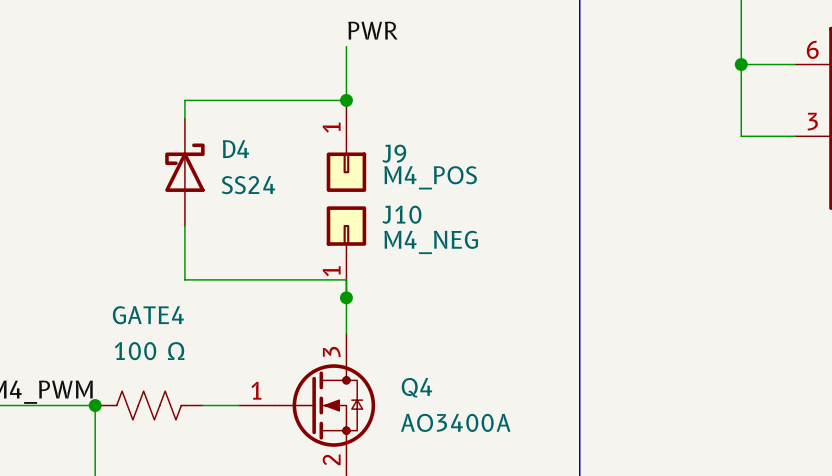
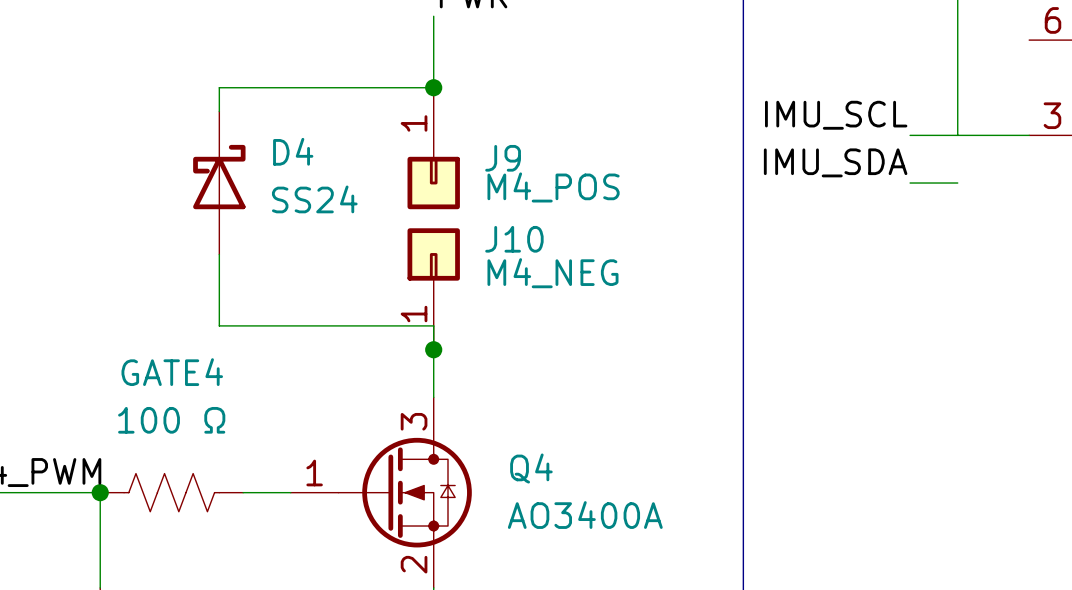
wire: (741, 64) (795, 64) -> none
junction: (741, 64) -> none
label: none -> IMU_SCL (836, 115)
wire: none -> (910, 135) (957, 135)
label: none -> IMU_SDA (835, 162)
wire: none -> (910, 183) (957, 183)

